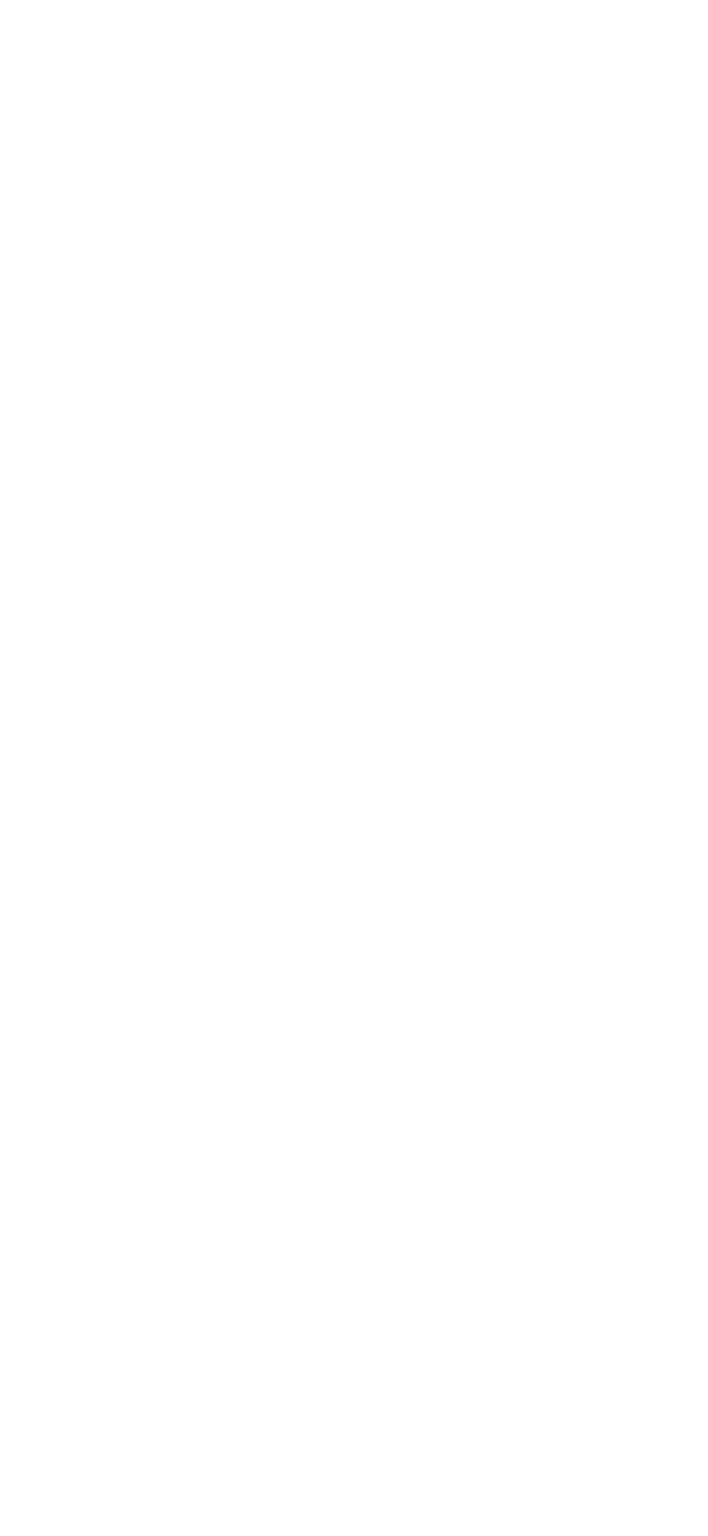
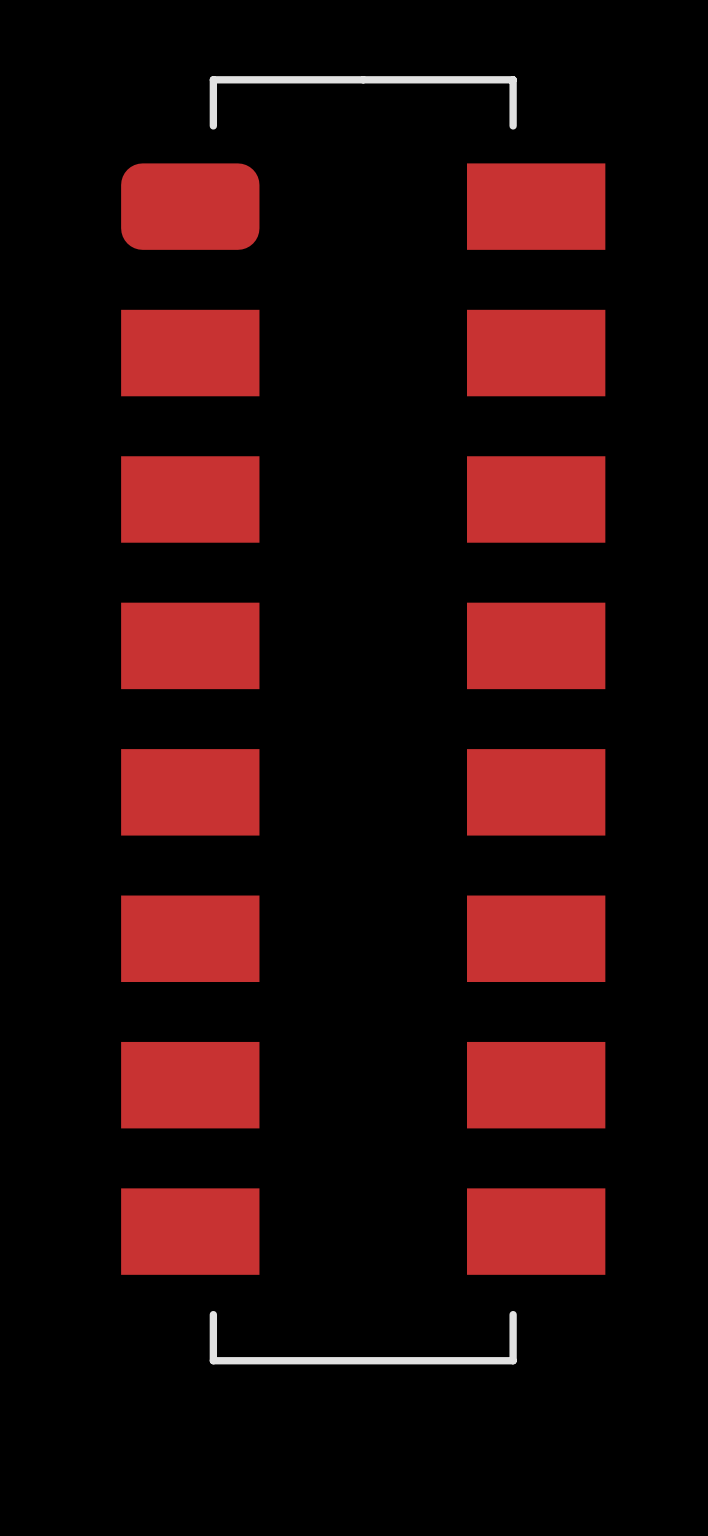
part: none -> (363, 720)

